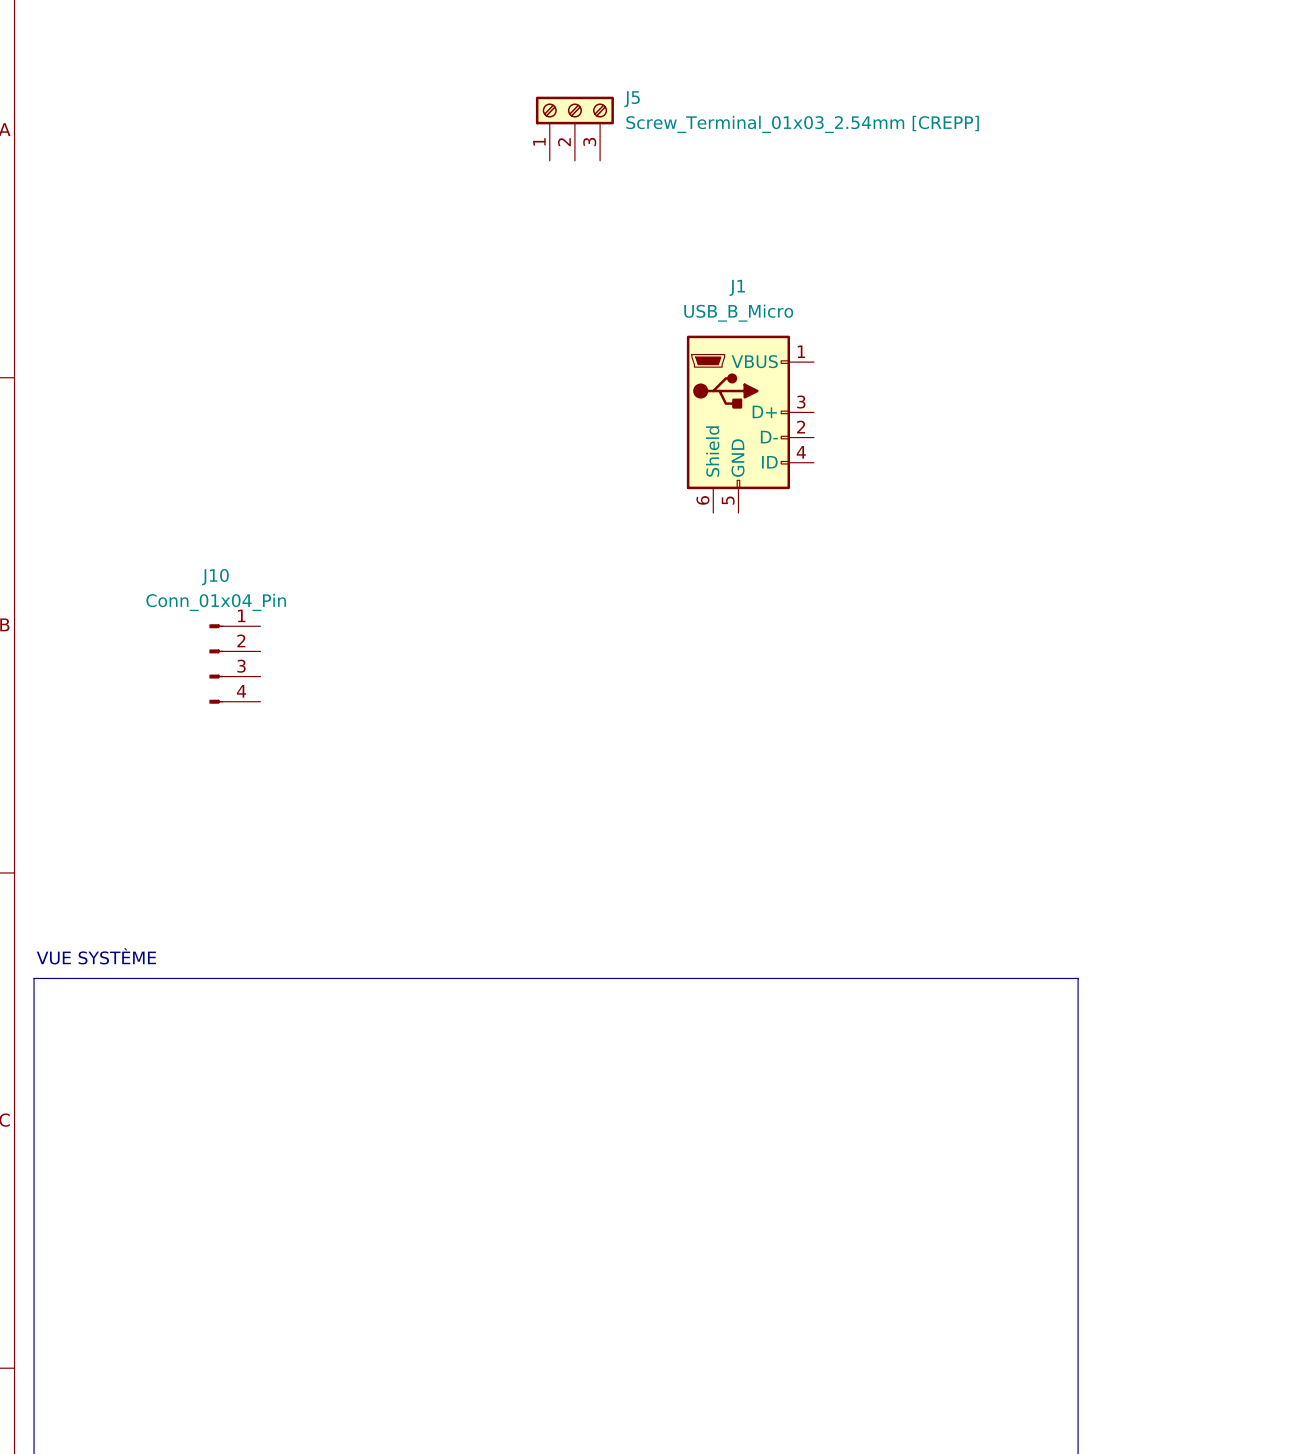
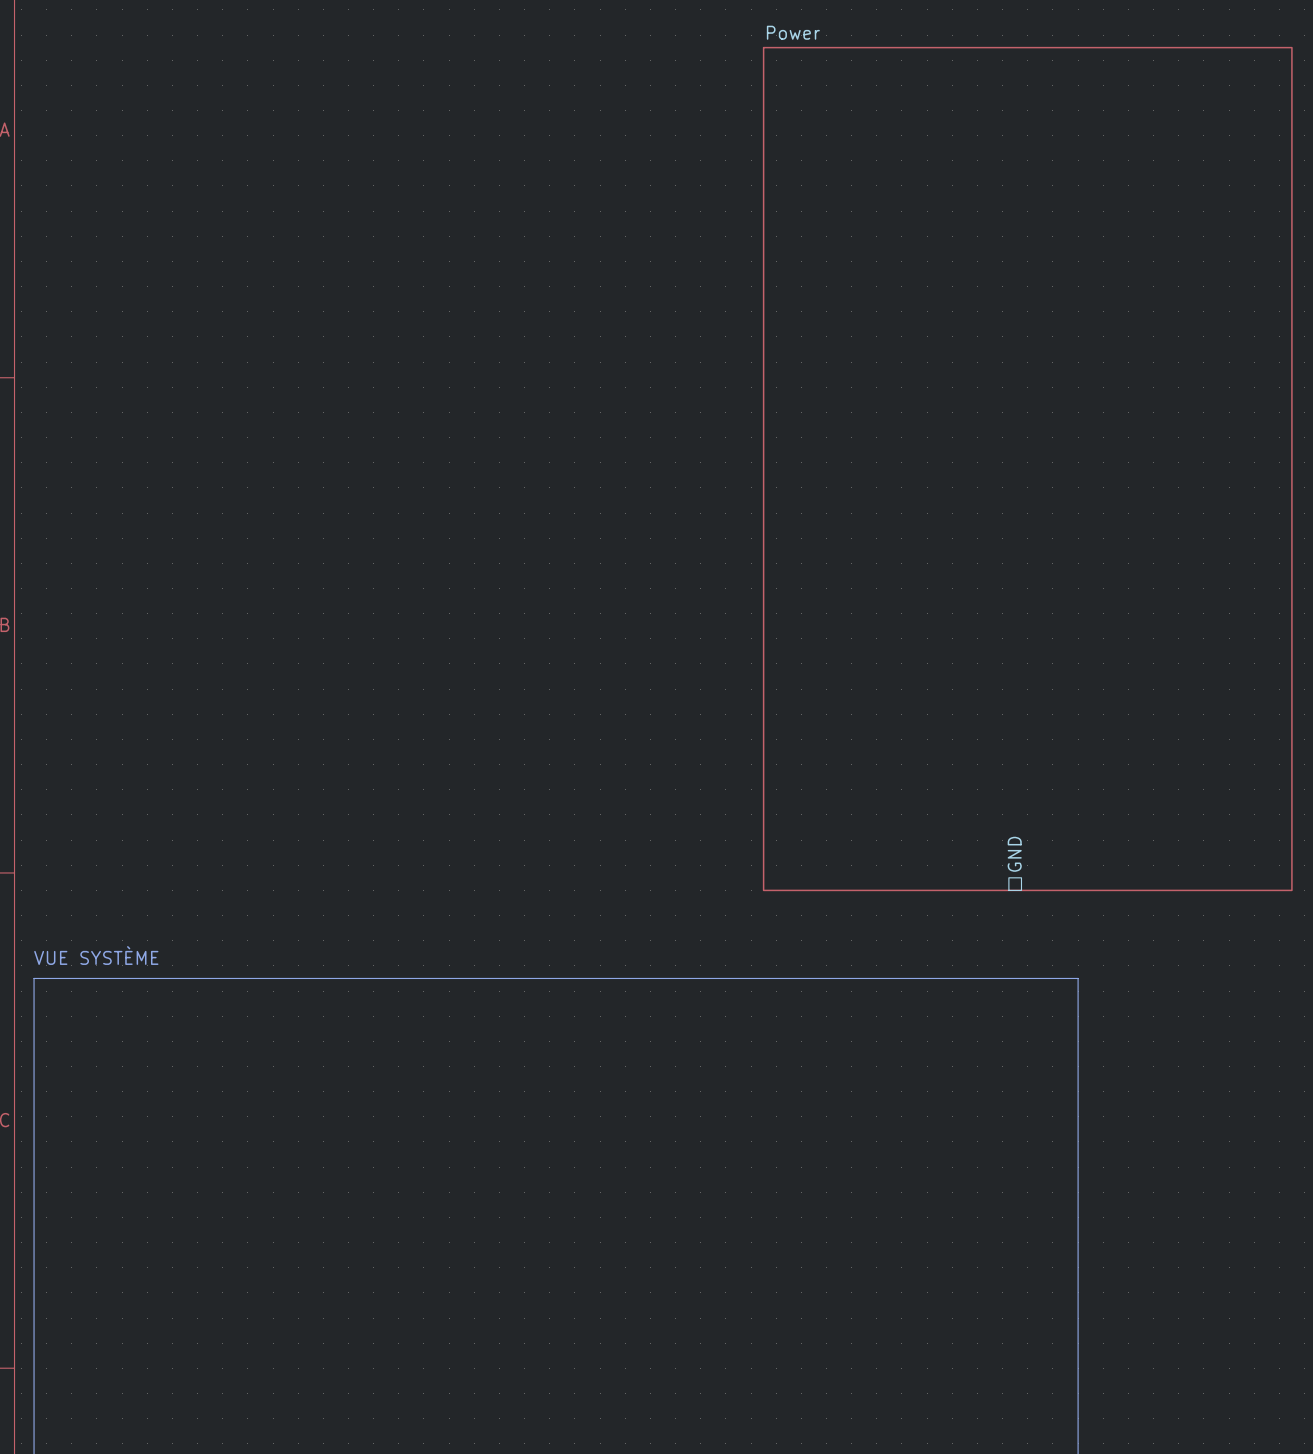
J5: Screw_Terminal_01x03_2.54mm [CREPP] (574, 128) -> none
J1: USB_B_Micro (750, 424) -> none
sheet Power: none -> (1027, 469)
J10: Conn_01x04_Pin (234, 663) -> none
sheet pin: none -> GND (1014, 854)

